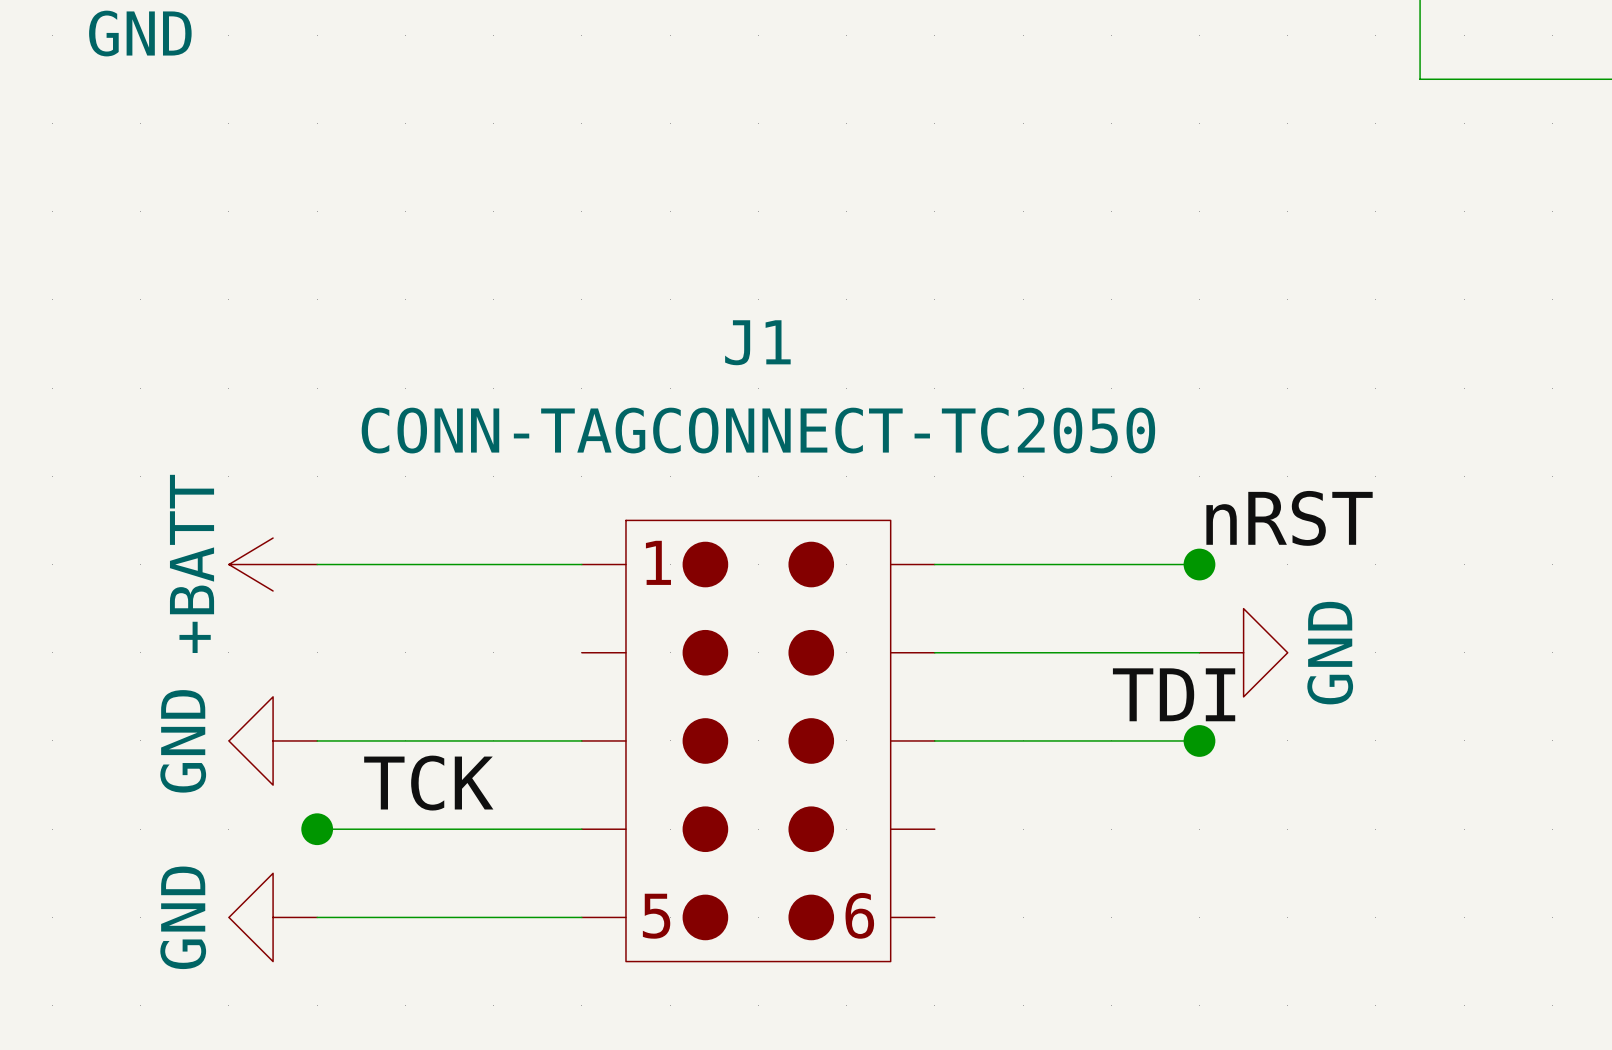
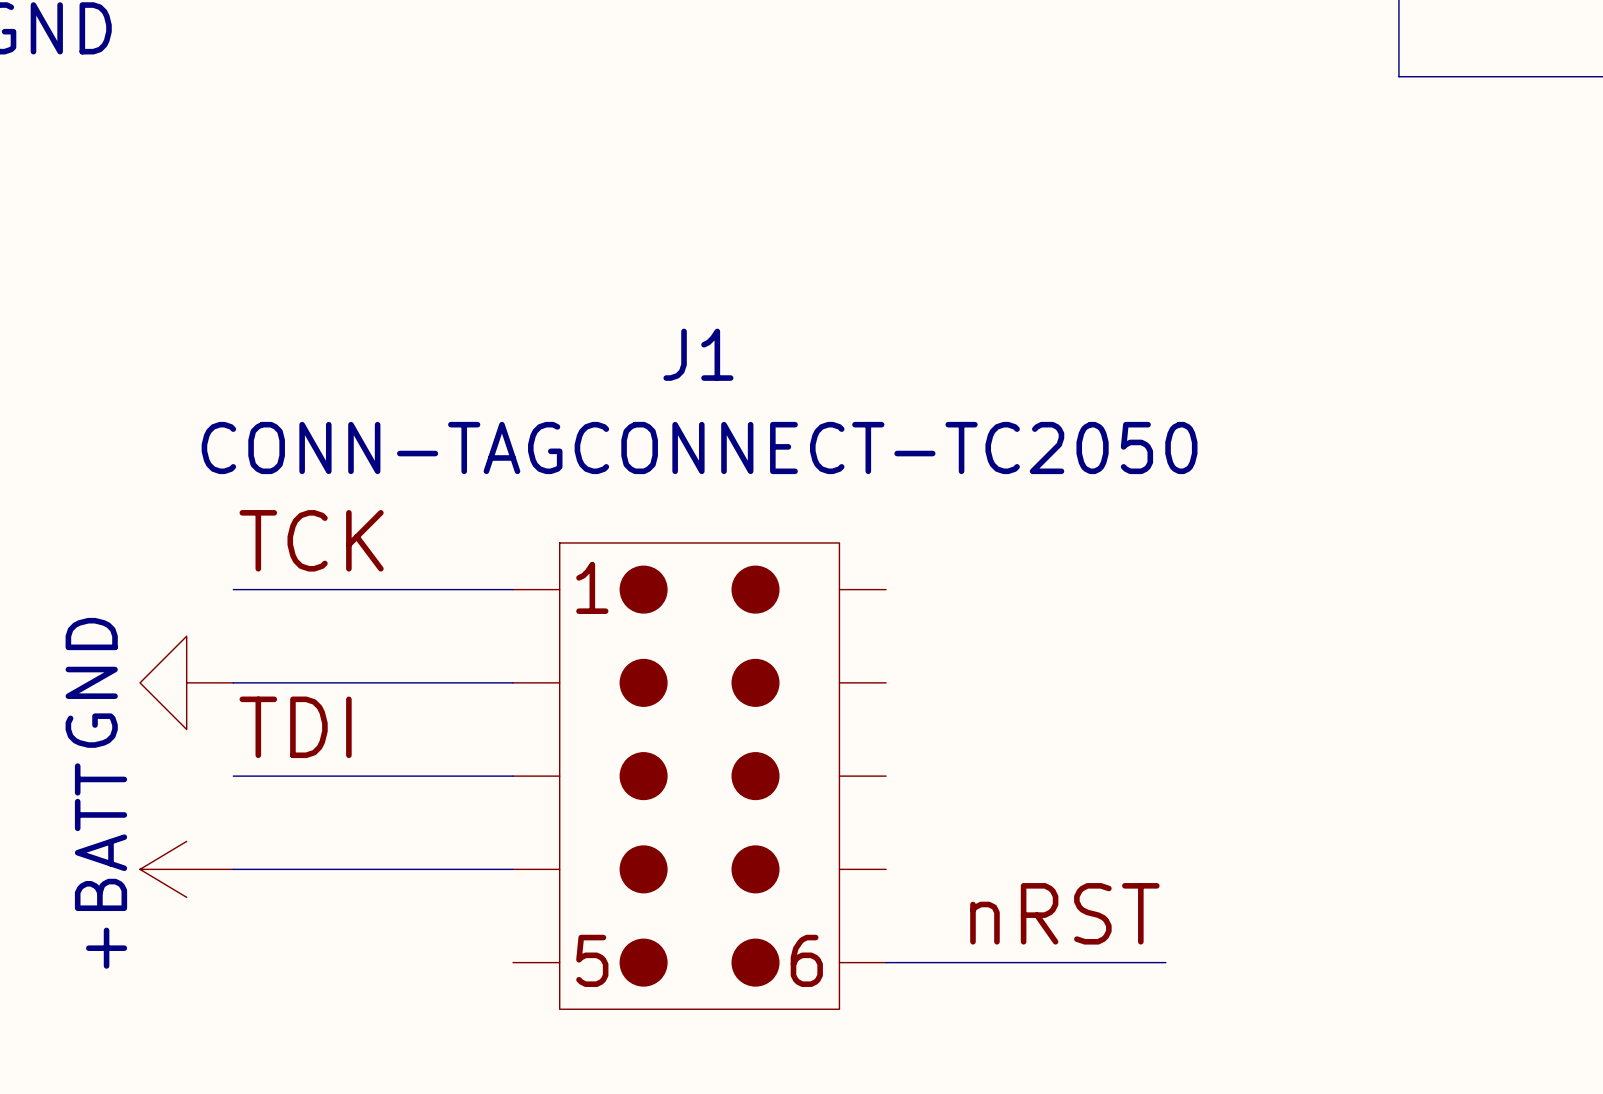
label position: nRST (1289, 518) -> nRST (1064, 913)
power symbol position: +BATT (273, 564) -> +BATT (186, 869)
wire: (934, 564) (1199, 564) -> none
junction: (1199, 564) -> none
wire: (934, 652) (1199, 652) -> none
power symbol: GND (1243, 652) -> none
label position: TDI (1174, 694) -> TDI (295, 727)
power symbol position: GND (273, 740) -> GND (186, 682)
wire: (934, 740) (1199, 740) -> (886, 962) (1165, 962)
junction: (1199, 740) -> none
label position: TCK (428, 783) -> TCK (311, 540)
junction: (317, 829) -> none
power symbol: GND (273, 917) -> none
wire: (317, 917) (581, 917) -> (233, 682) (513, 682)

